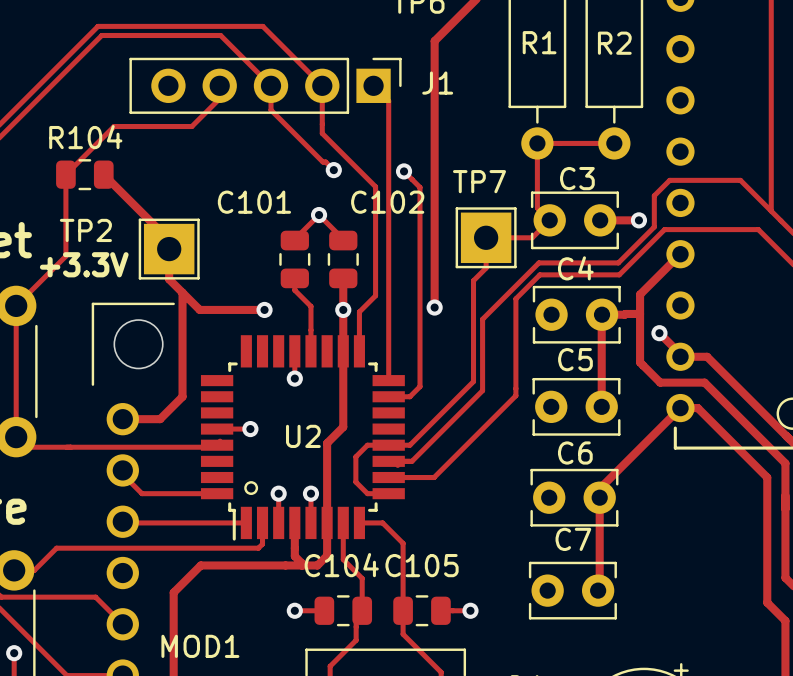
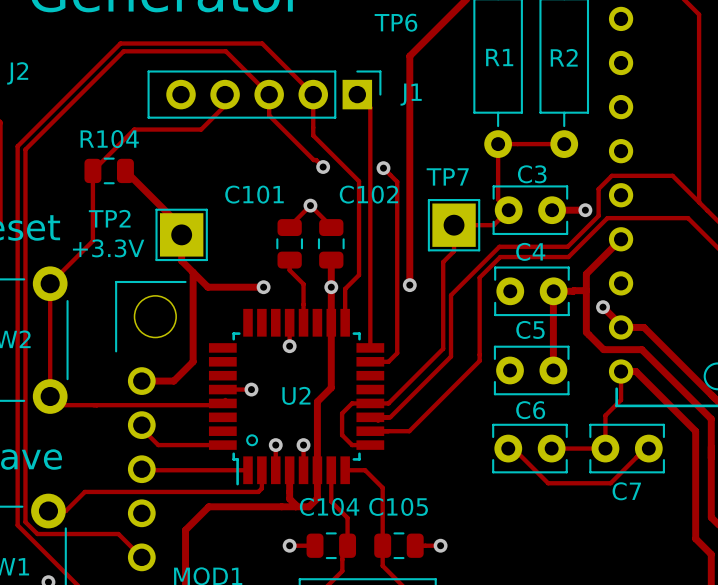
track: (680, 408) (599, 488) (599, 589) (598, 590) -> (621, 371) (621, 399) (605, 415) (605, 448) (551, 448)
track: none -> (508, 443) (548, 483) (610, 483) (650, 443)
C7 name position: C7 (573, 539) -> C7 (626, 491)
C7 position: (572, 590) -> (627, 448)

